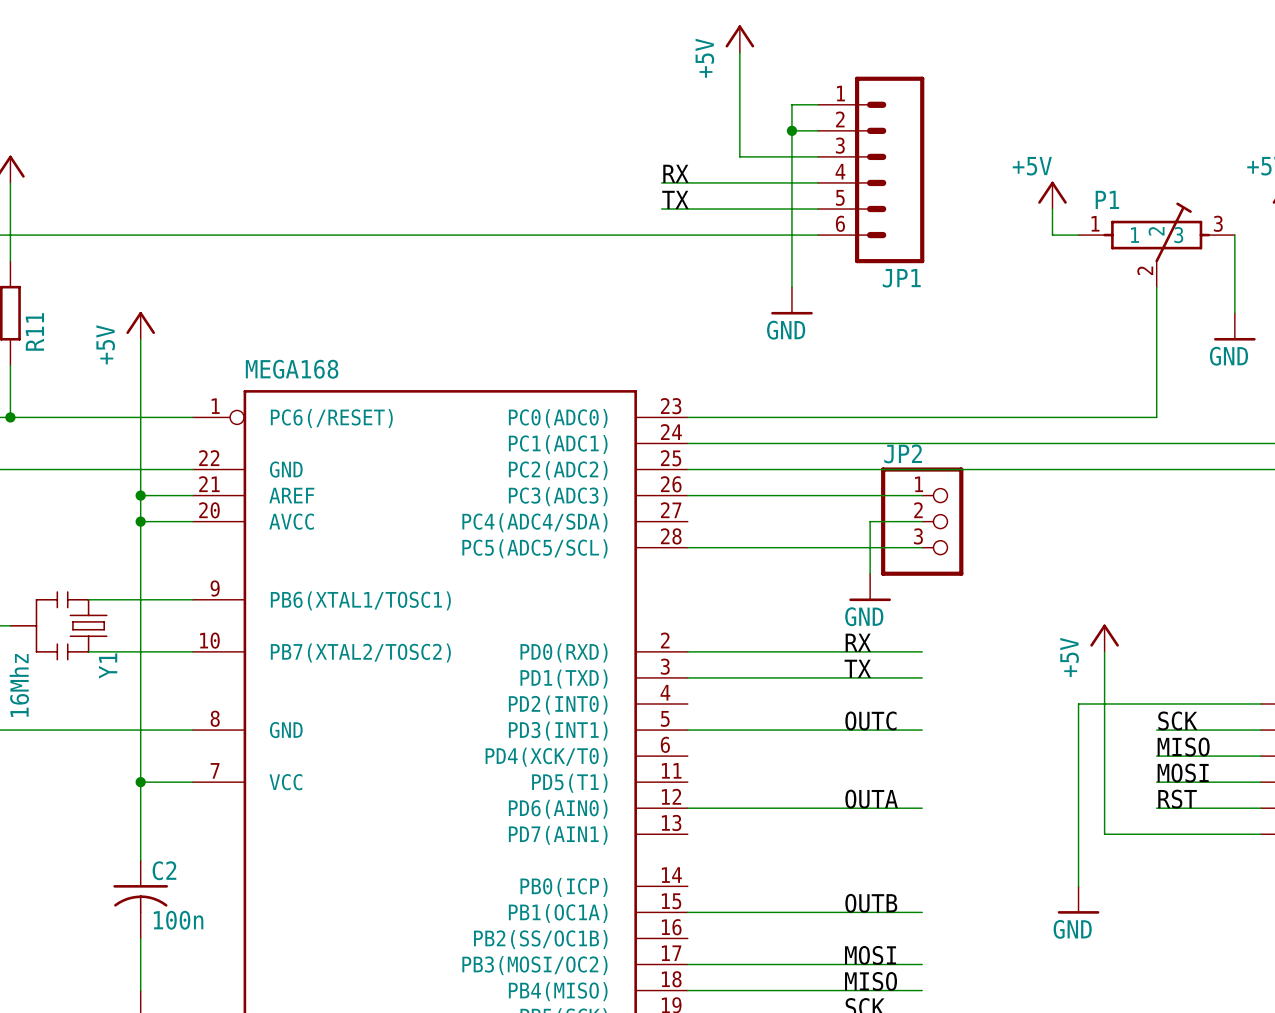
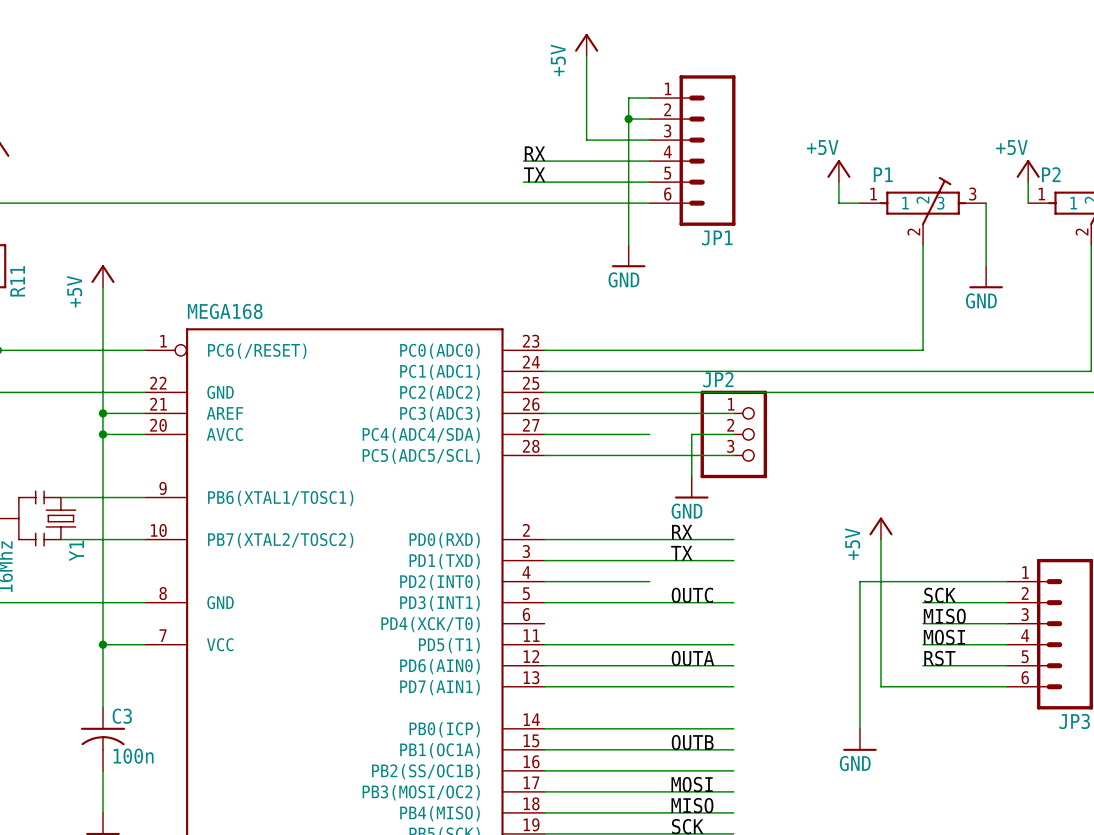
wire: none -> (544, 434) (649, 434)
wire: none -> (544, 581) (649, 581)
wire: none -> (544, 644) (733, 644)
wire: none -> (544, 686) (733, 686)
C2 name: C2 (164, 870) -> C3 (122, 716)
wire: none -> (544, 728) (733, 728)
wire: none -> (544, 770) (733, 770)

